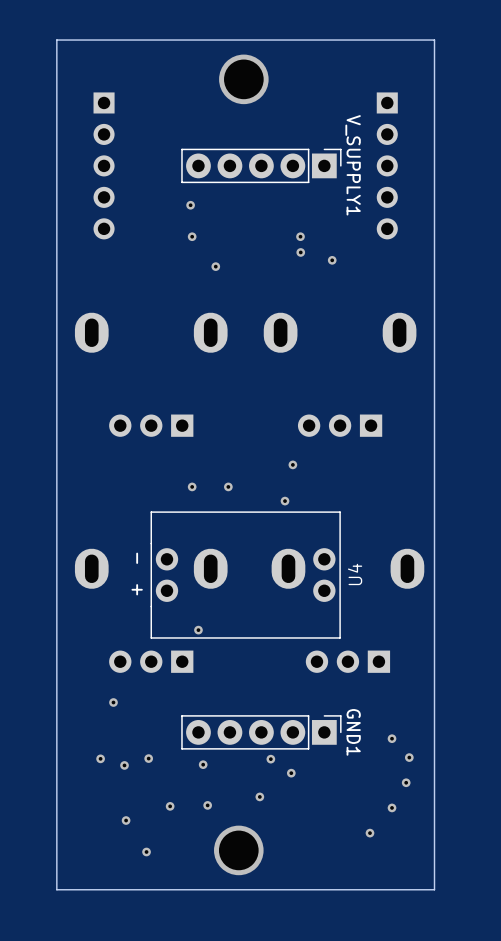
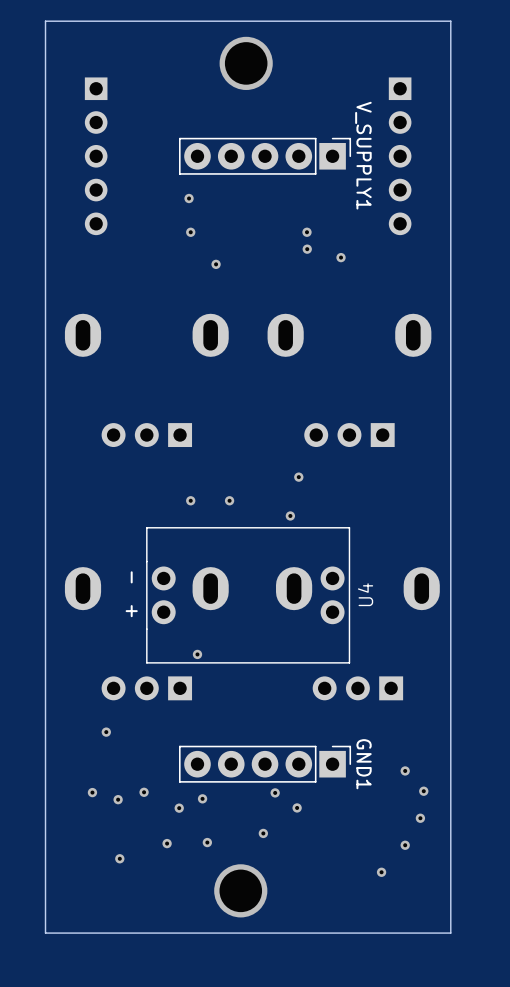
via: none -> (179, 808)
via: (146, 851) -> none

